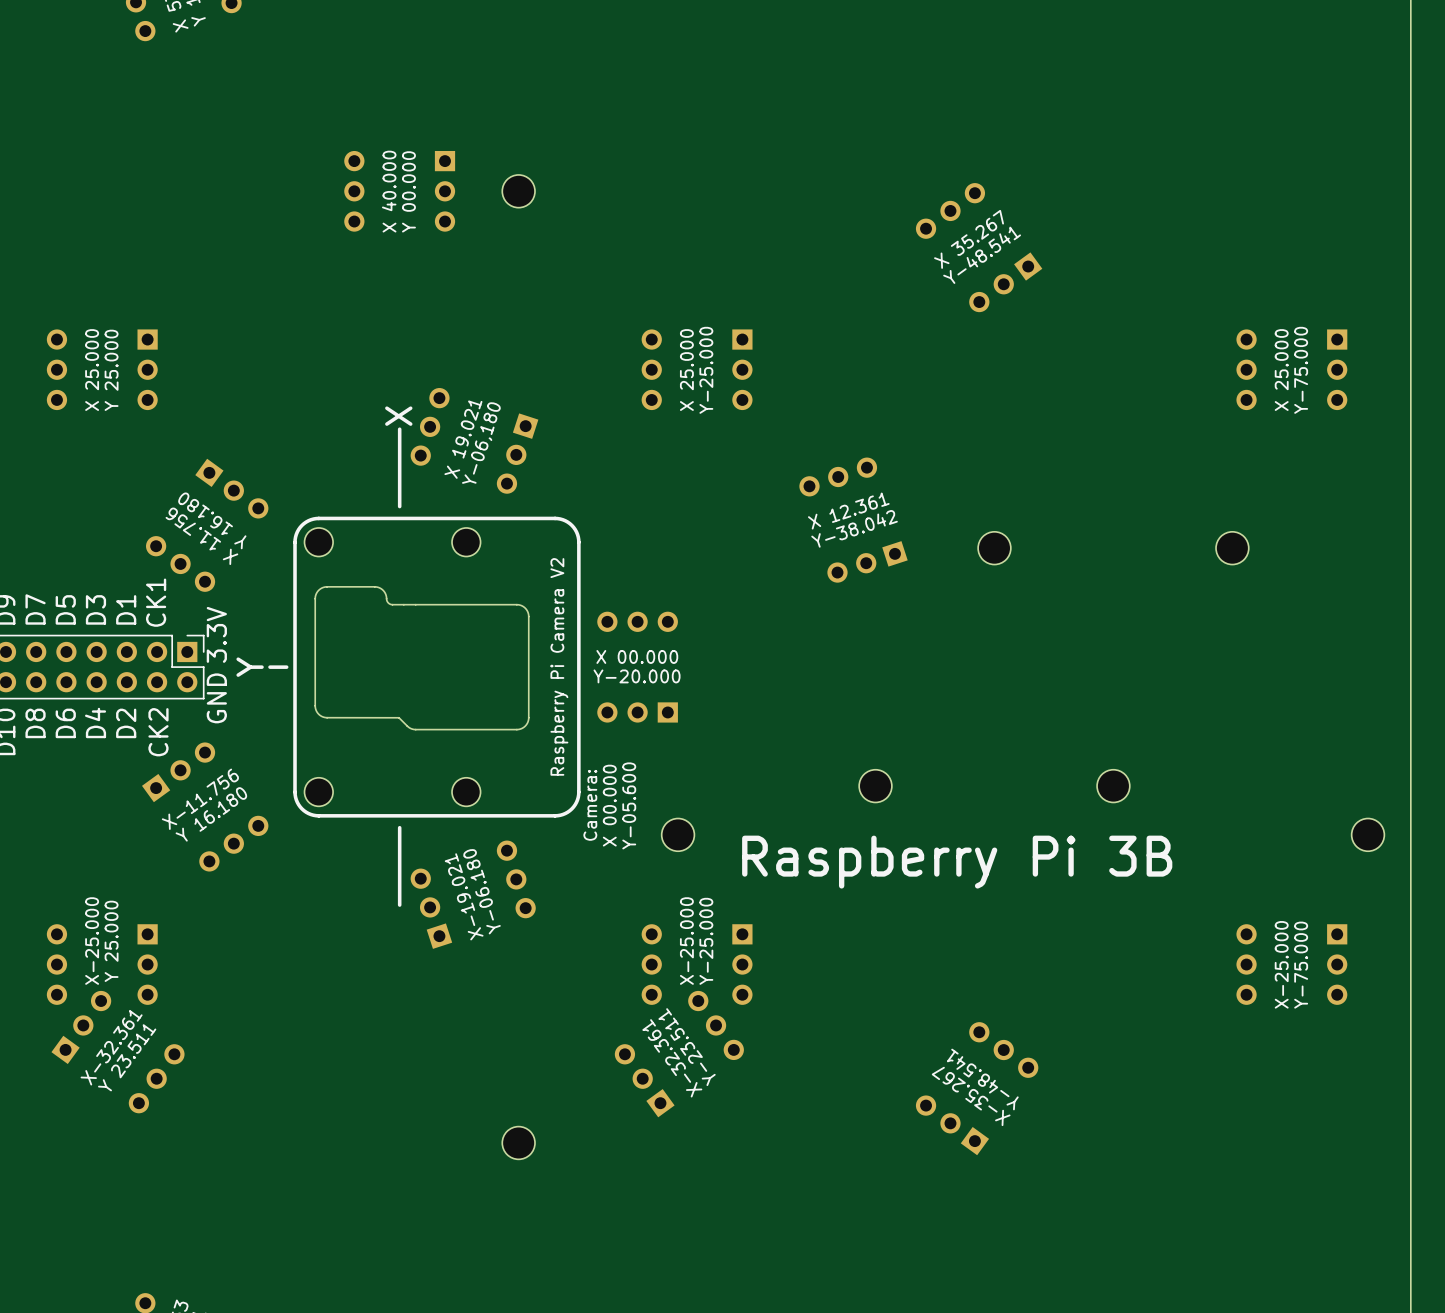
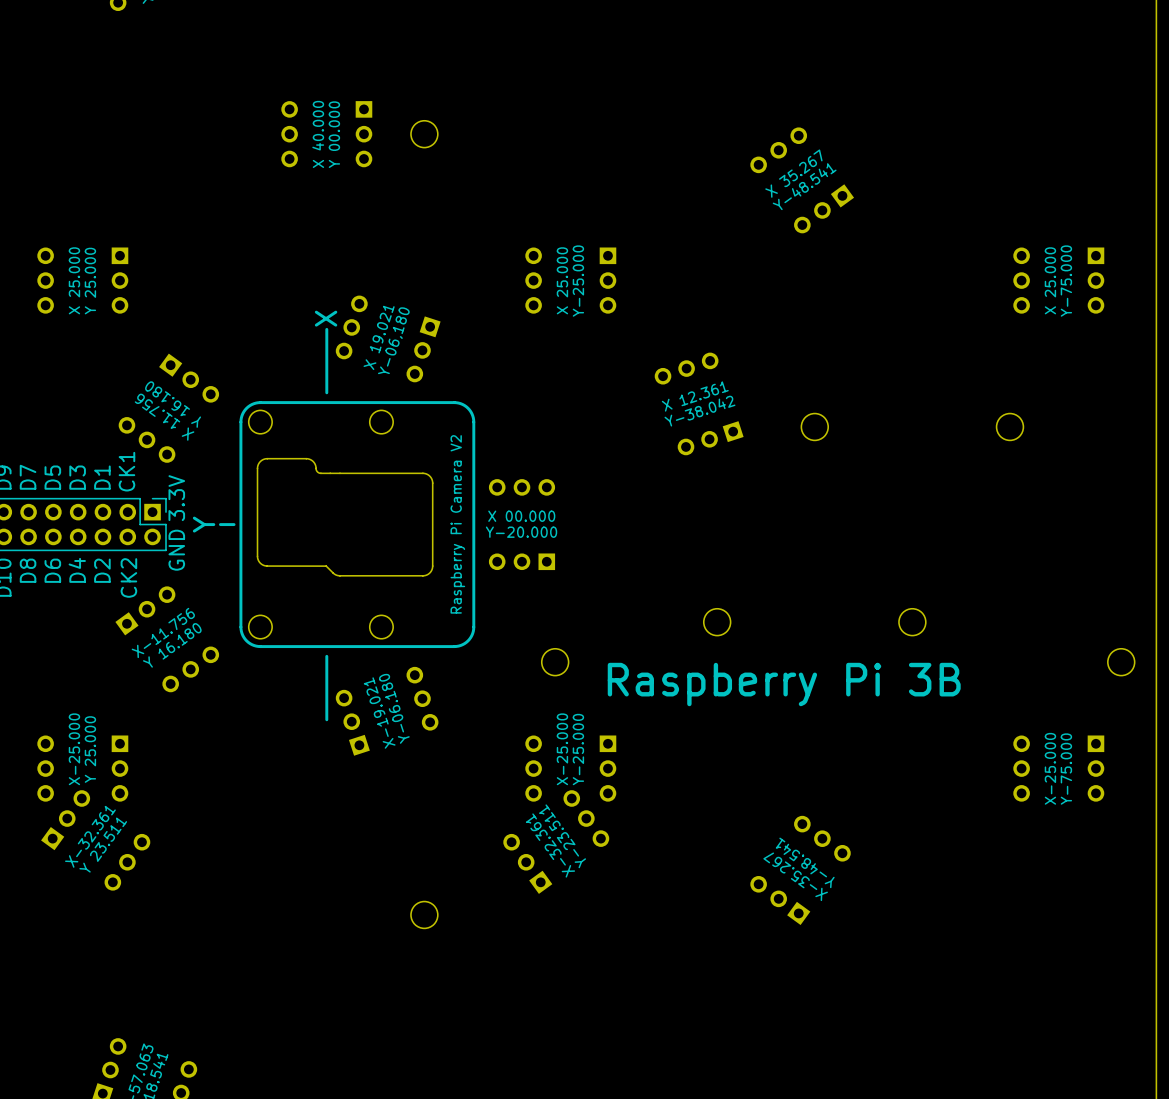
text: Camera: (590, 805) -> none
text: X 00.000 (609, 805) -> none
text: Y-05.600 (629, 805) -> none

